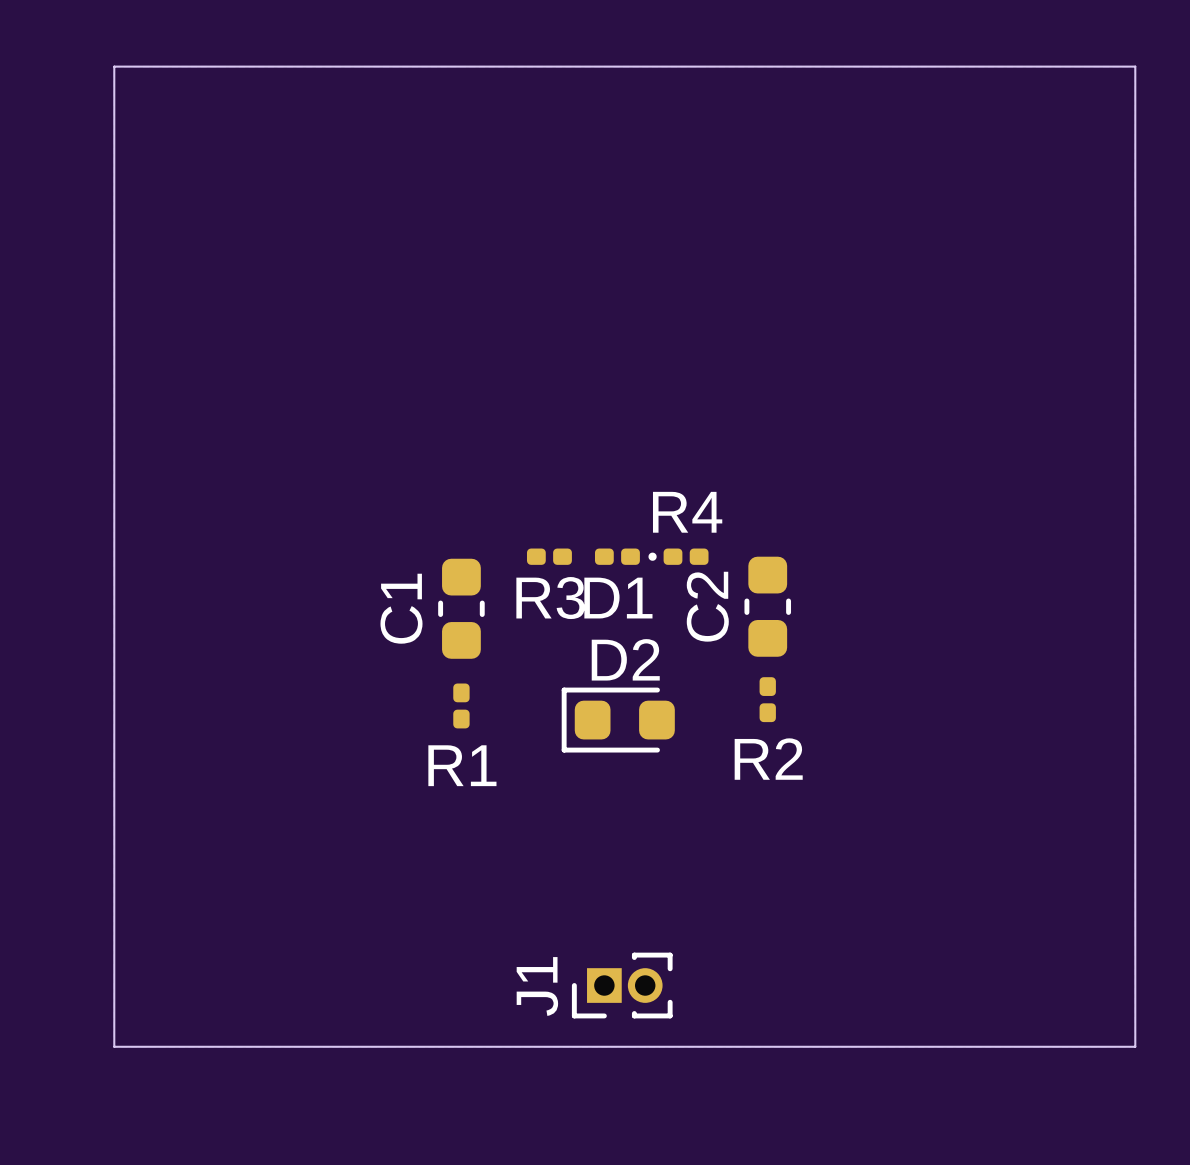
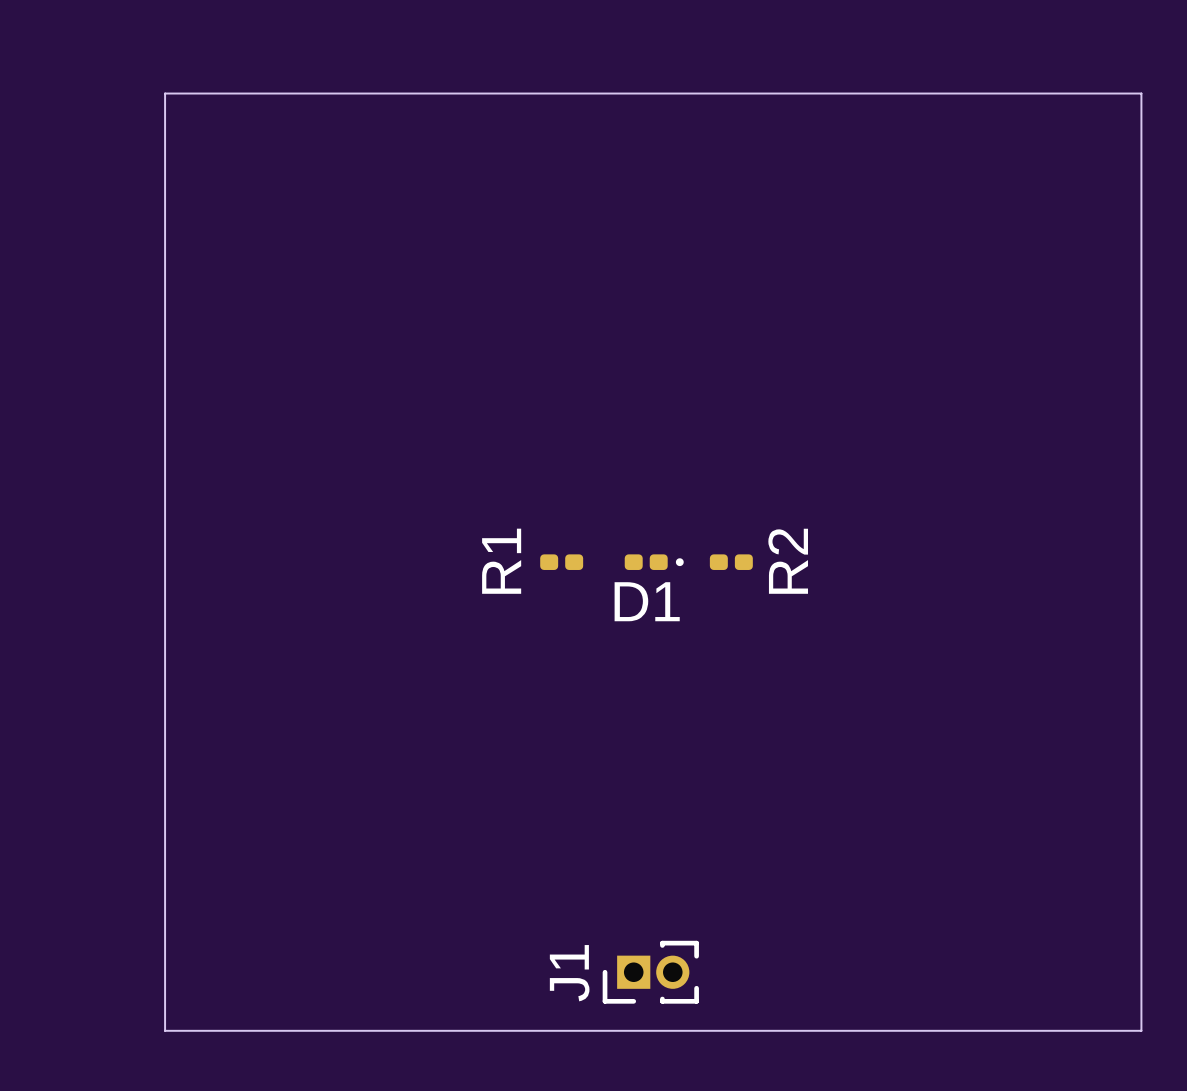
R3: (549, 556) -> none
R4: (686, 556) -> none
C2: (767, 606) -> none
C1: (461, 608) -> none
R2 rotation: 0° (767, 699) -> 90° clockwise (731, 562)
R2 position: (767, 699) -> (731, 562)
R1 rotation: 0° (461, 705) -> 90° clockwise (561, 562)
R1 position: (461, 705) -> (561, 562)
D2: (618, 720) -> none
R2 name position: R2 (768, 759) -> R2 (788, 561)

